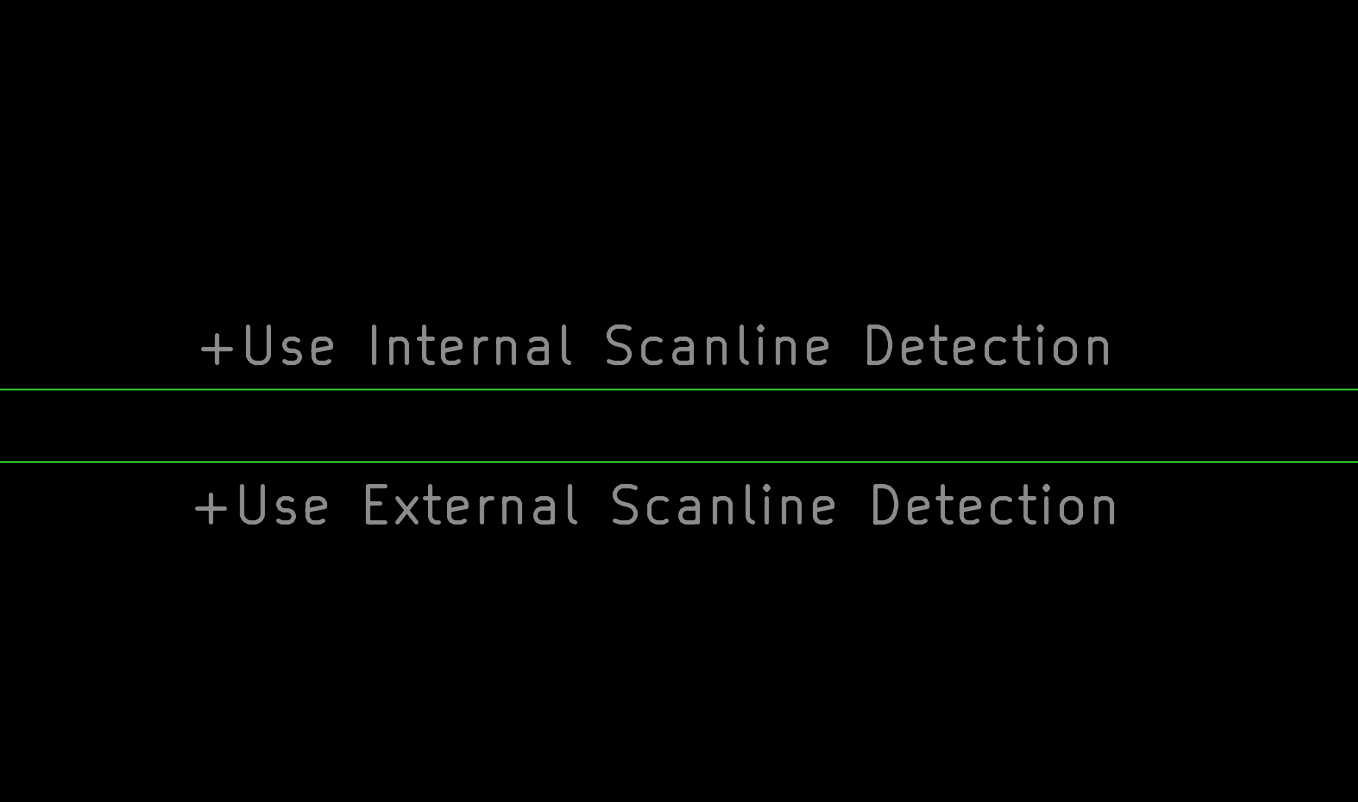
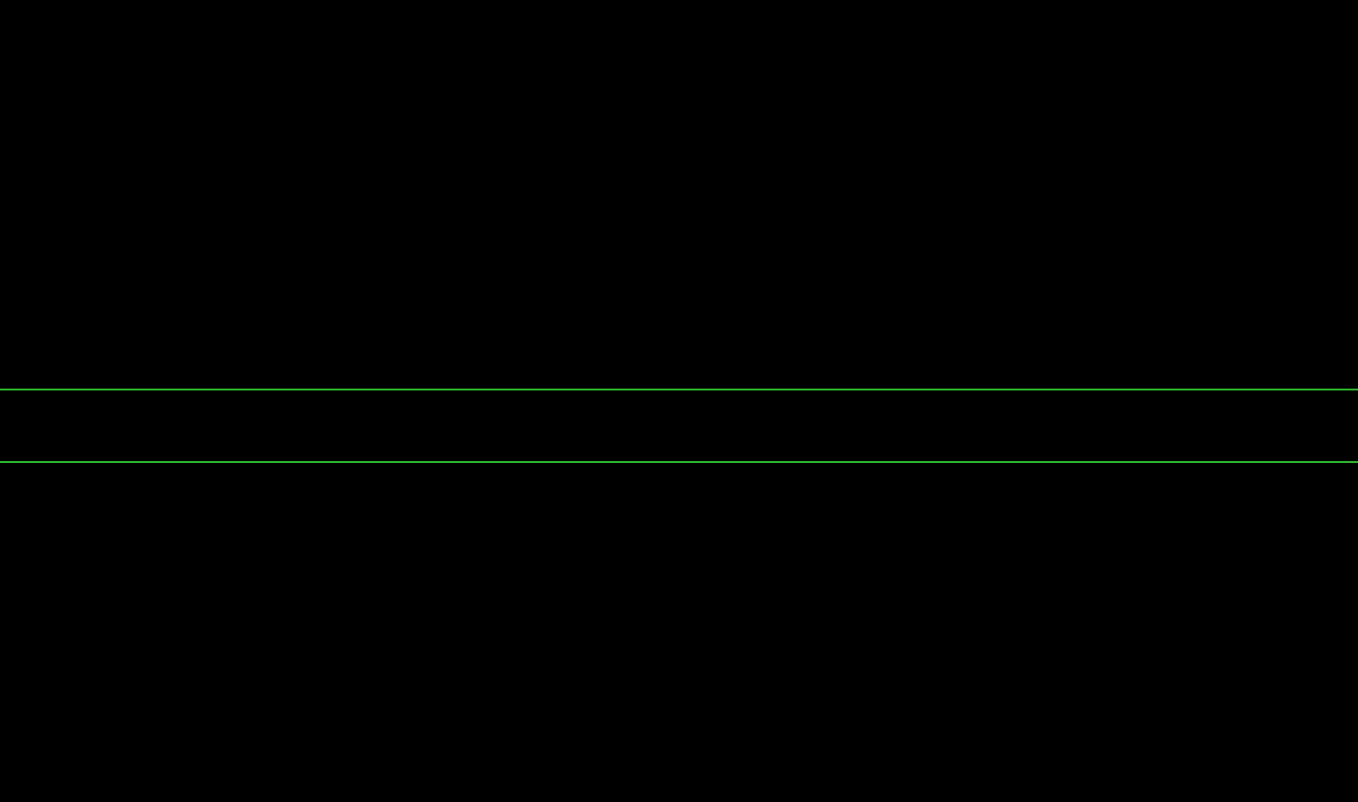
text: +Use Internal Scanline Detection (654, 344) -> none
text: +Use External Scanline Detection (654, 504) -> none

